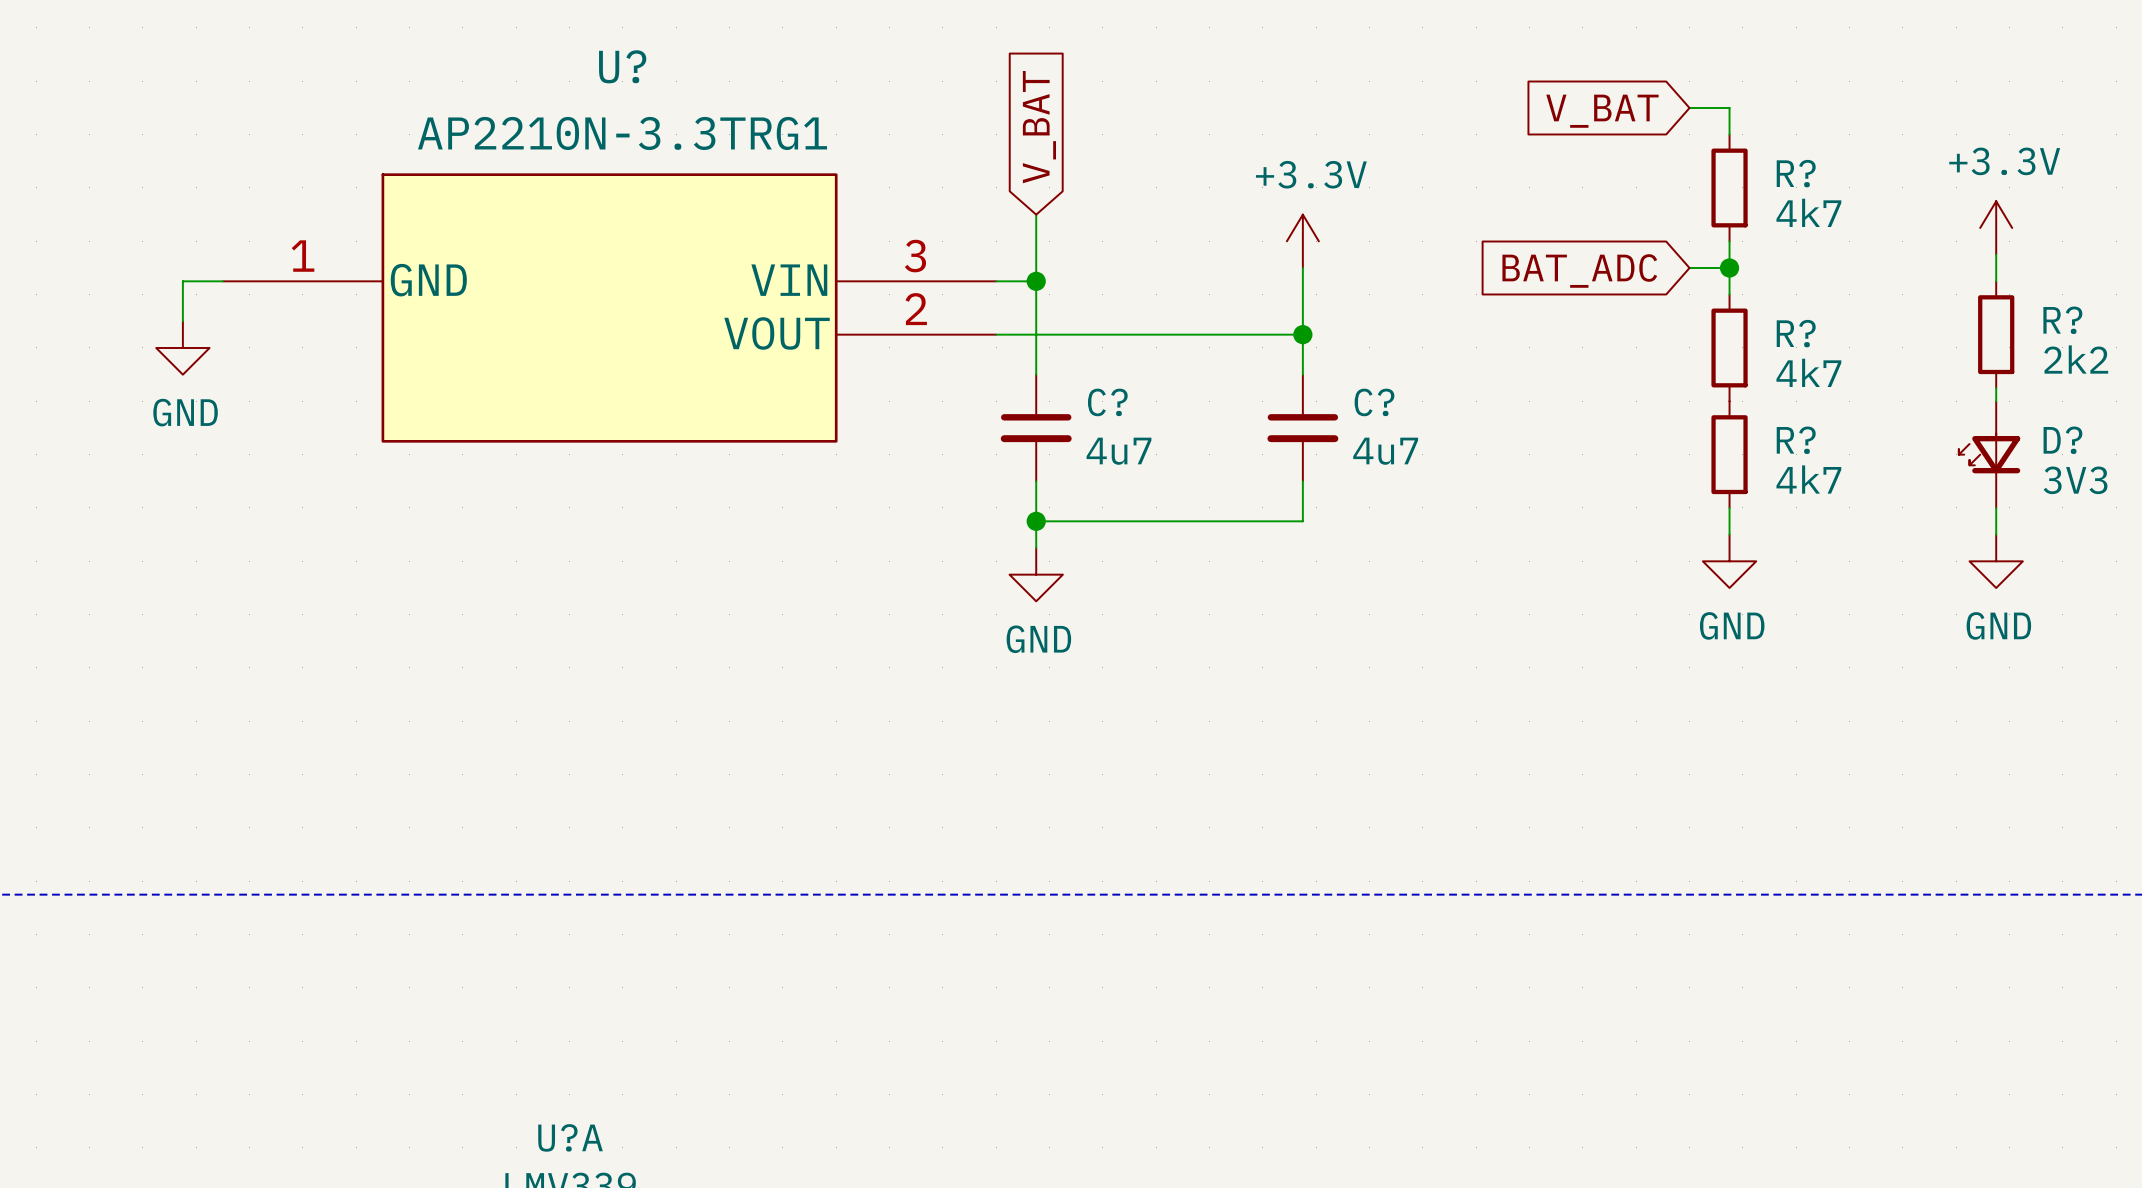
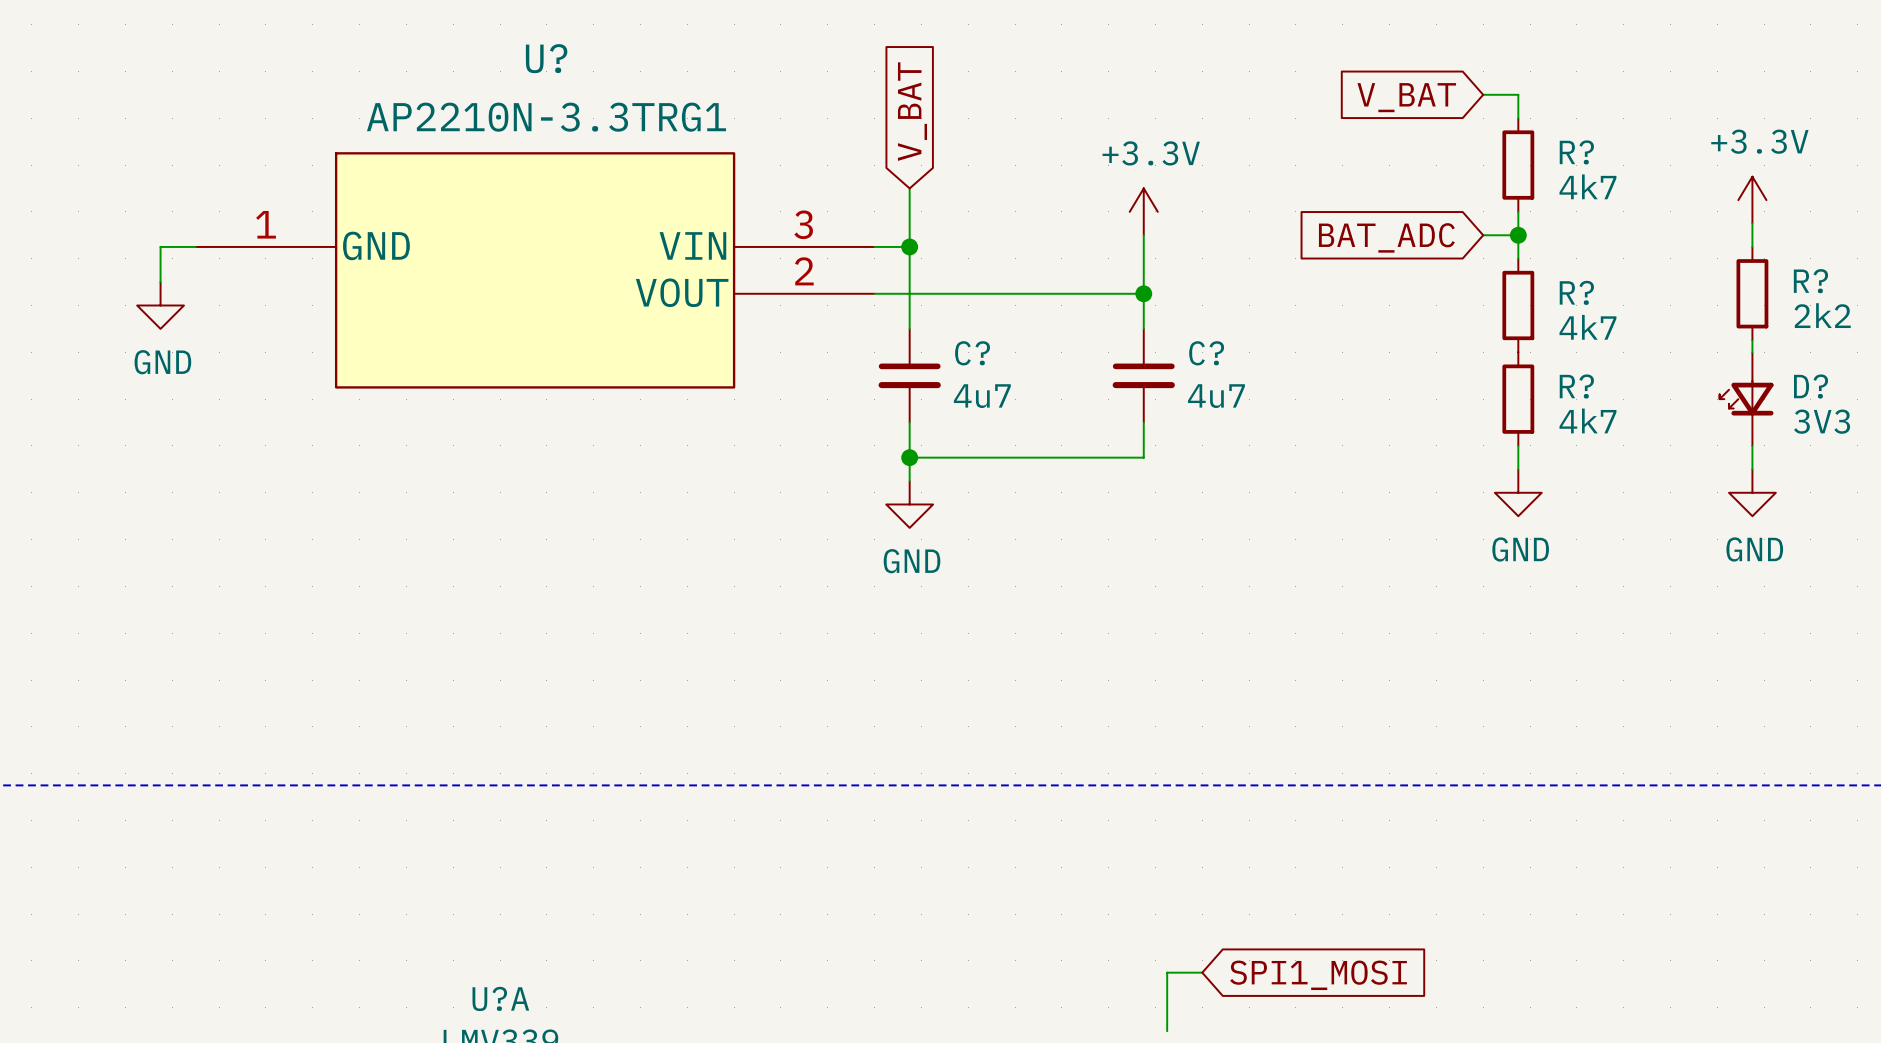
wire: none -> (1202, 972) (1167, 972) (1167, 1031)
global label: none -> SPI1_MOSI (1318, 975)

